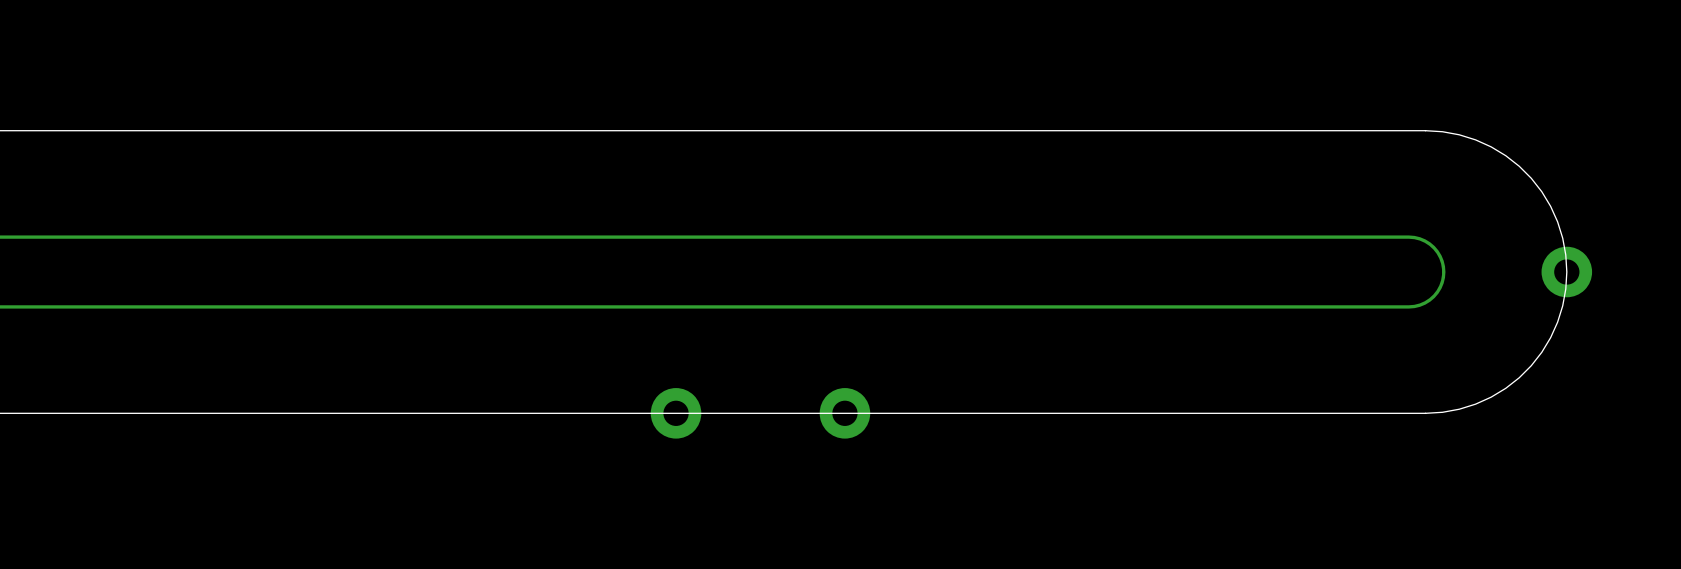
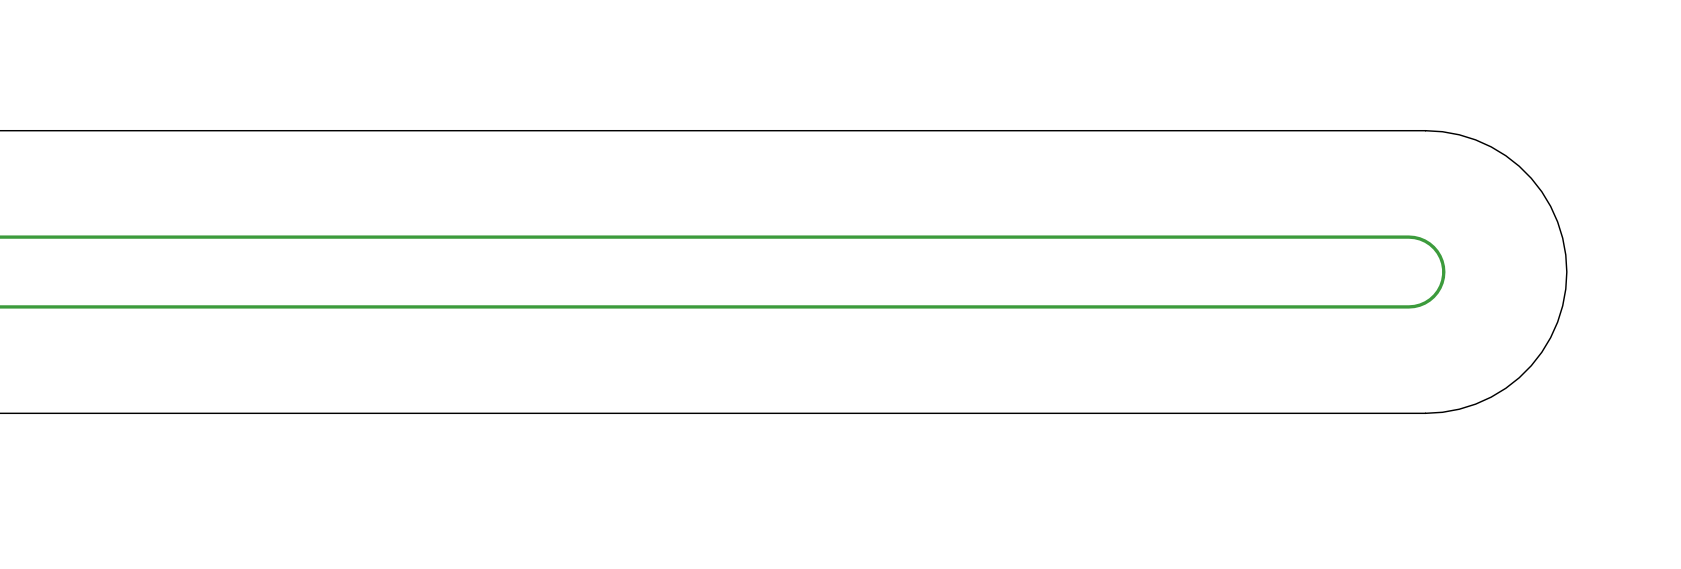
part: (1566, 272) -> none
part: (676, 413) -> none
part: (844, 413) -> none

